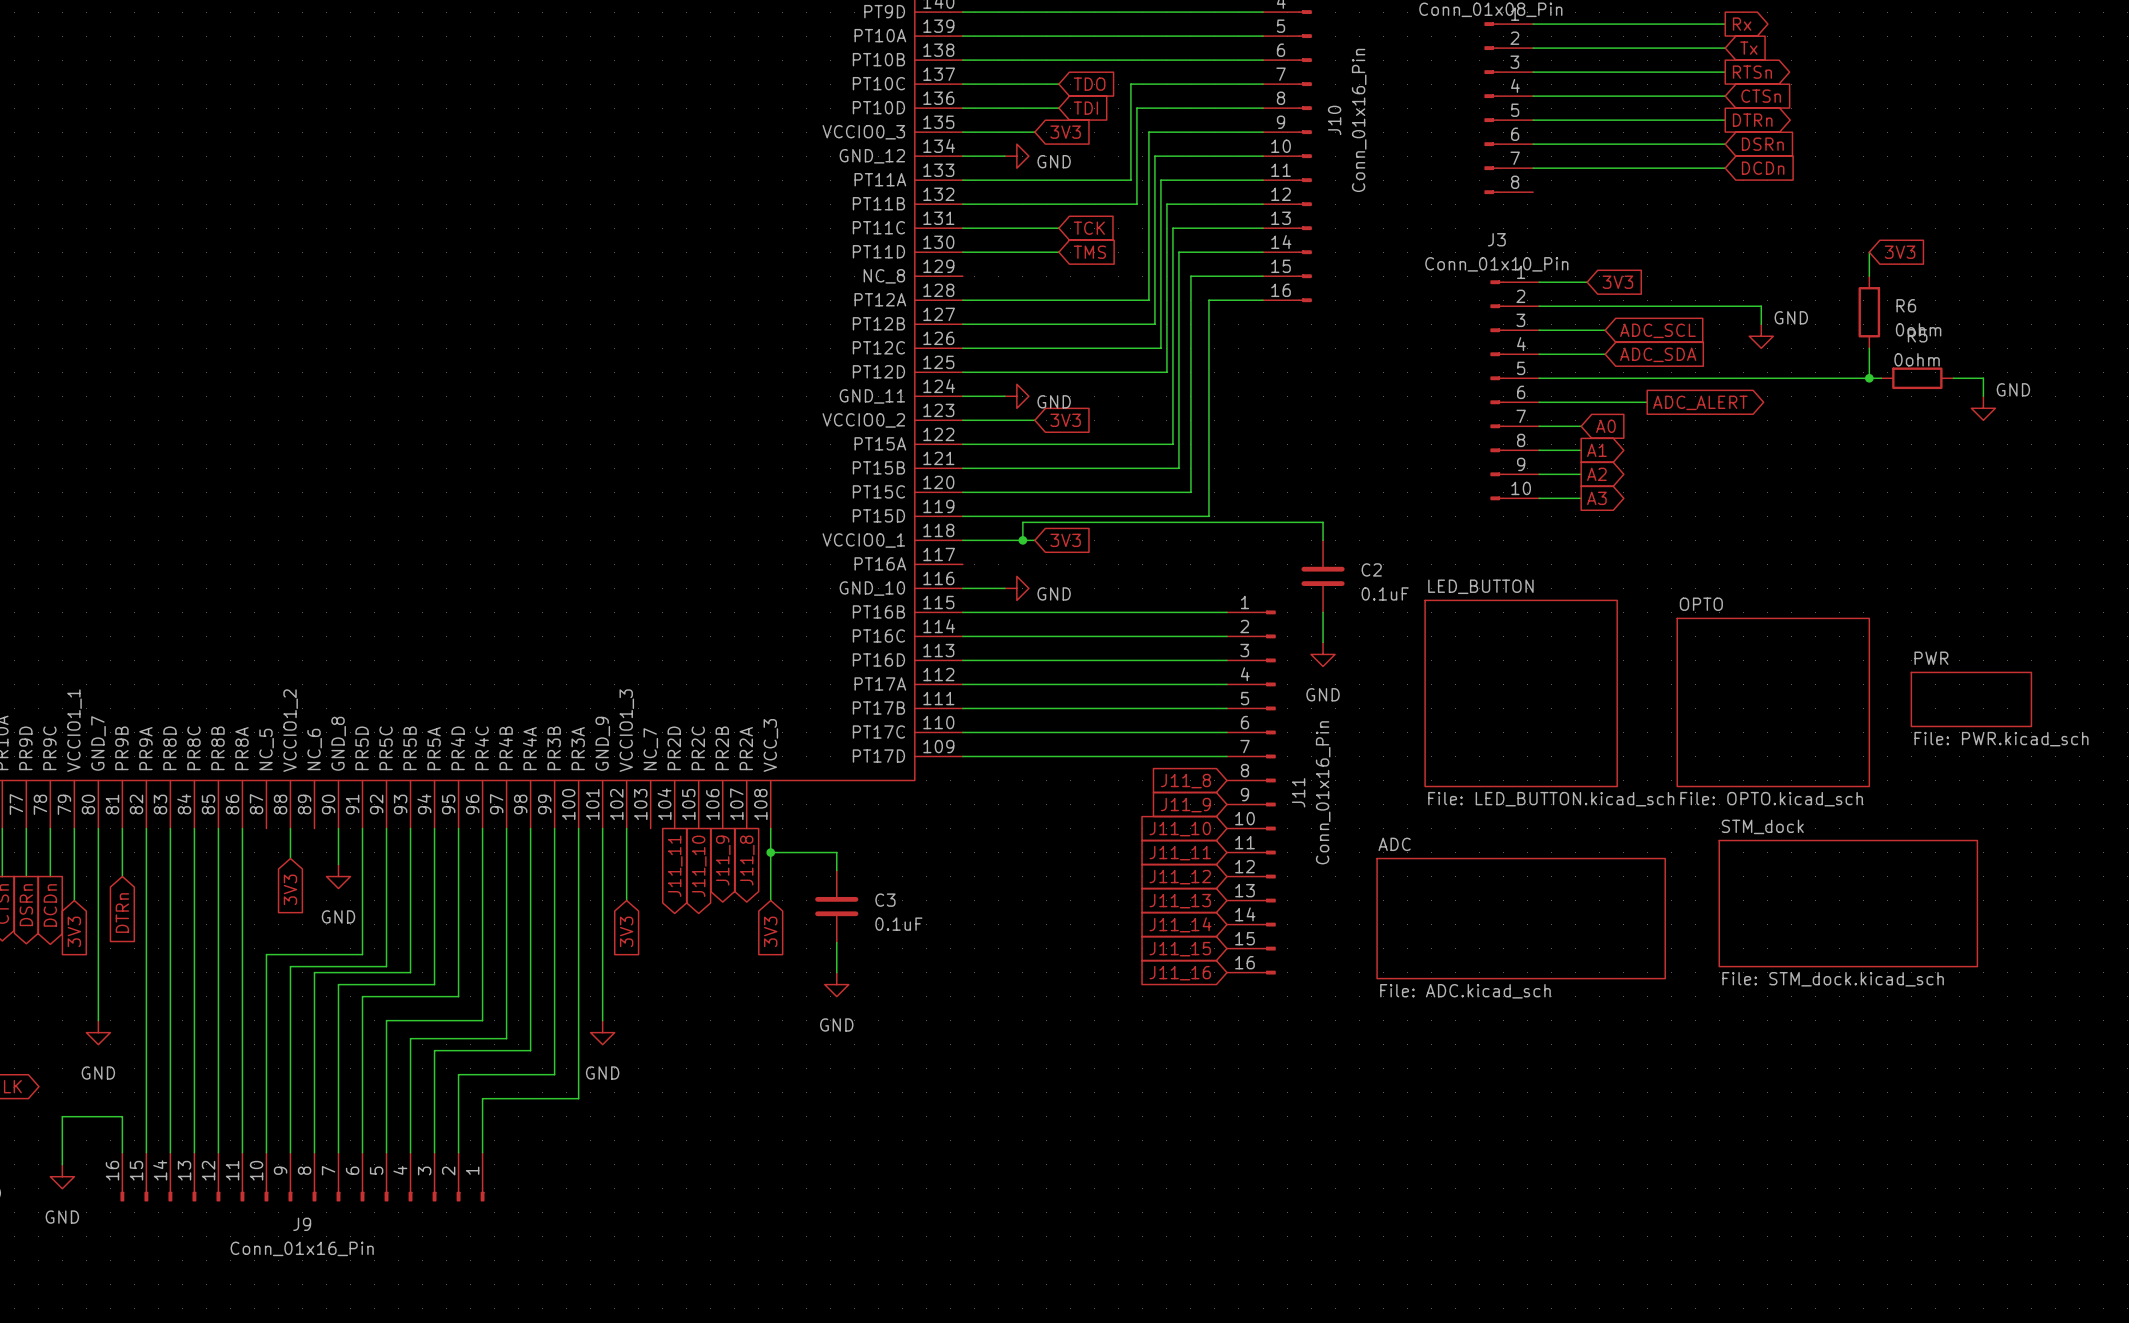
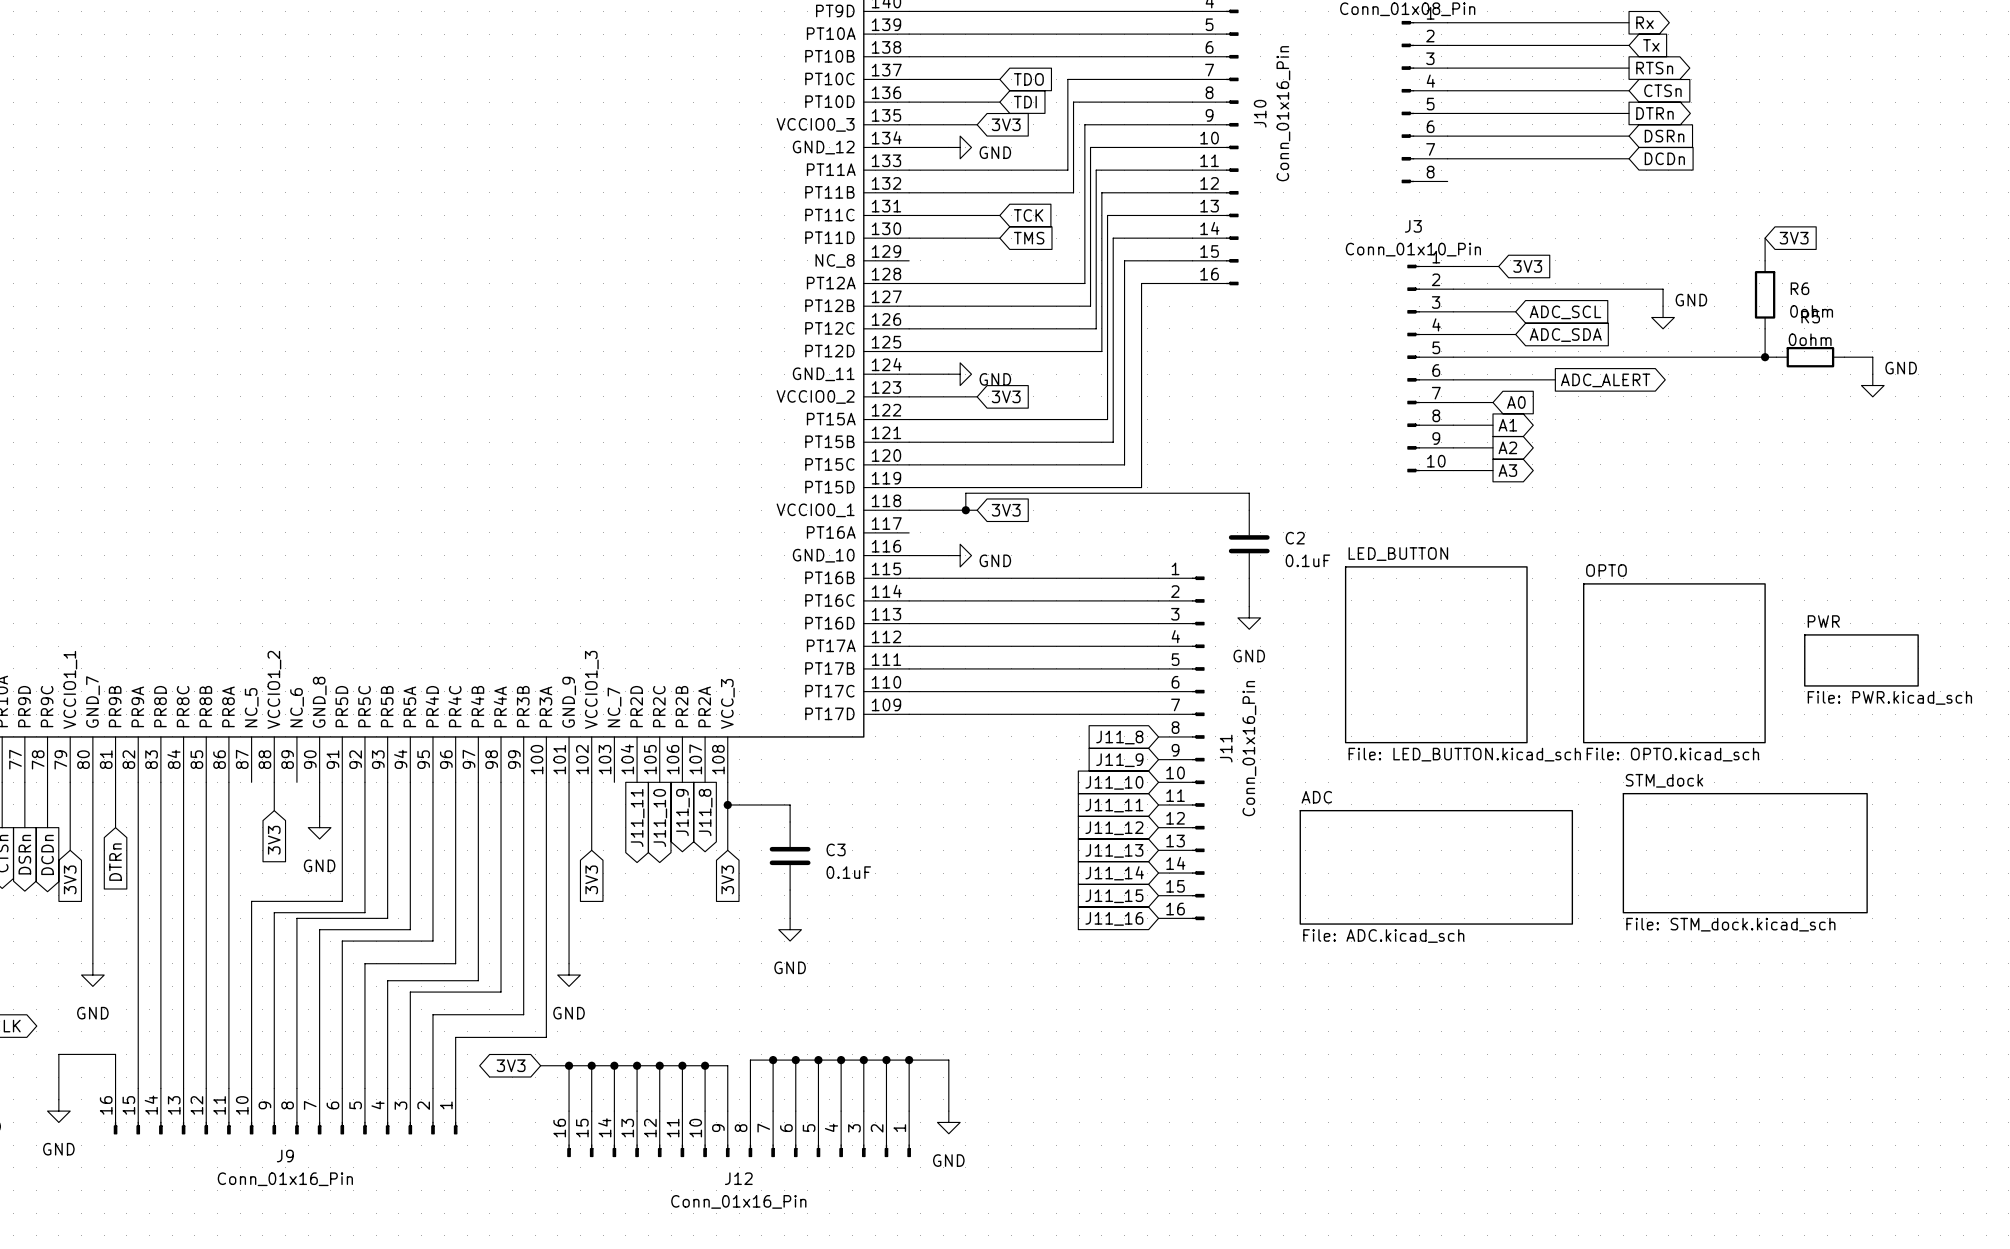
wire: none -> (773, 1060) (773, 1111)
junction: none -> (773, 1060)
wire: none -> (795, 1060) (795, 1111)
junction: none -> (795, 1060)
wire: none -> (818, 1060) (818, 1111)
junction: none -> (818, 1060)
wire: none -> (841, 1060) (841, 1111)
junction: none -> (841, 1060)
wire: none -> (863, 1060) (863, 1111)
junction: none -> (863, 1060)
wire: none -> (886, 1060) (886, 1111)
junction: none -> (886, 1060)
wire: none -> (909, 1060) (909, 1111)
junction: none -> (909, 1060)
global label: none -> 3V3 (511, 1065)
wire: none -> (540, 1065) (727, 1065) (727, 1111)
wire: none -> (569, 1065) (569, 1111)
junction: none -> (569, 1065)
wire: none -> (591, 1065) (591, 1111)
junction: none -> (591, 1065)
wire: none -> (614, 1065) (614, 1111)
junction: none -> (614, 1065)
wire: none -> (637, 1065) (637, 1111)
junction: none -> (637, 1065)
wire: none -> (659, 1065) (659, 1111)
junction: none -> (659, 1065)
wire: none -> (682, 1065) (682, 1111)
junction: none -> (682, 1065)
wire: none -> (705, 1065) (705, 1111)
junction: none -> (705, 1065)
wire: none -> (750, 1111) (750, 1060) (948, 1060) (948, 1111)
power symbol: none -> GND (948, 1122)
J12: none -> Conn_01x16_Pin (739, 1134)

